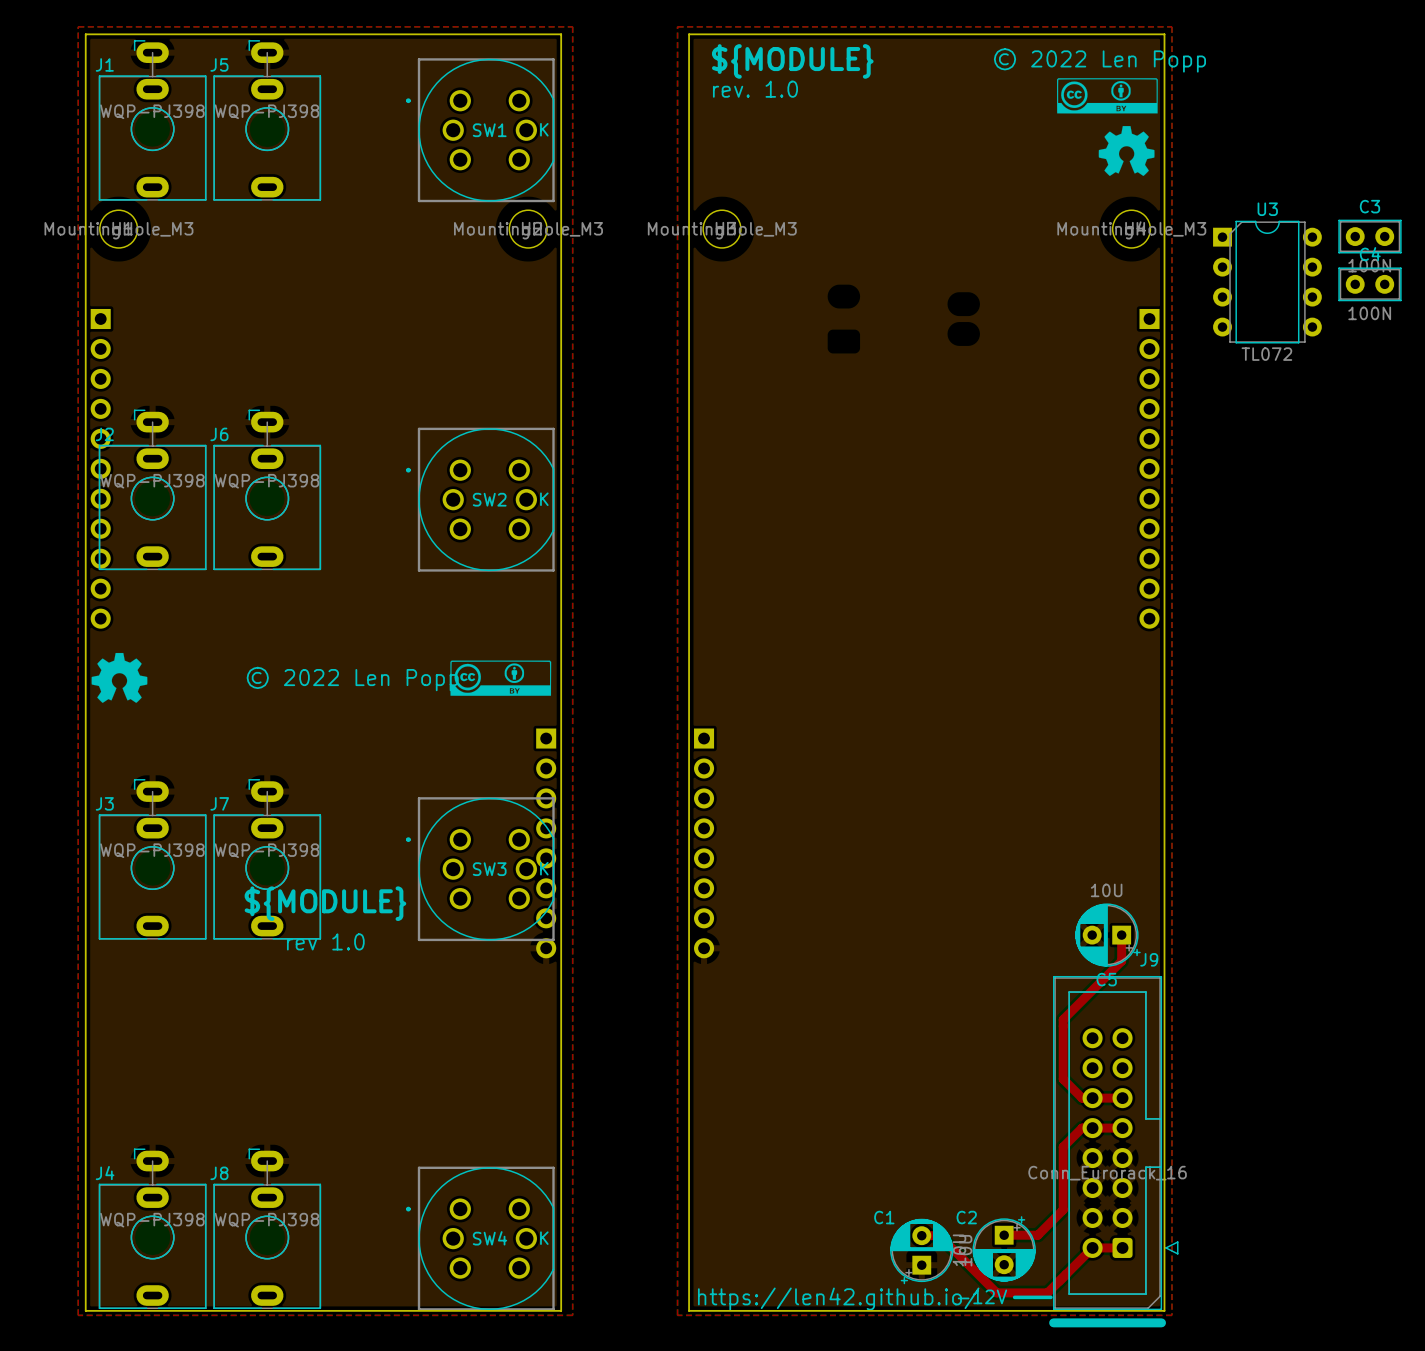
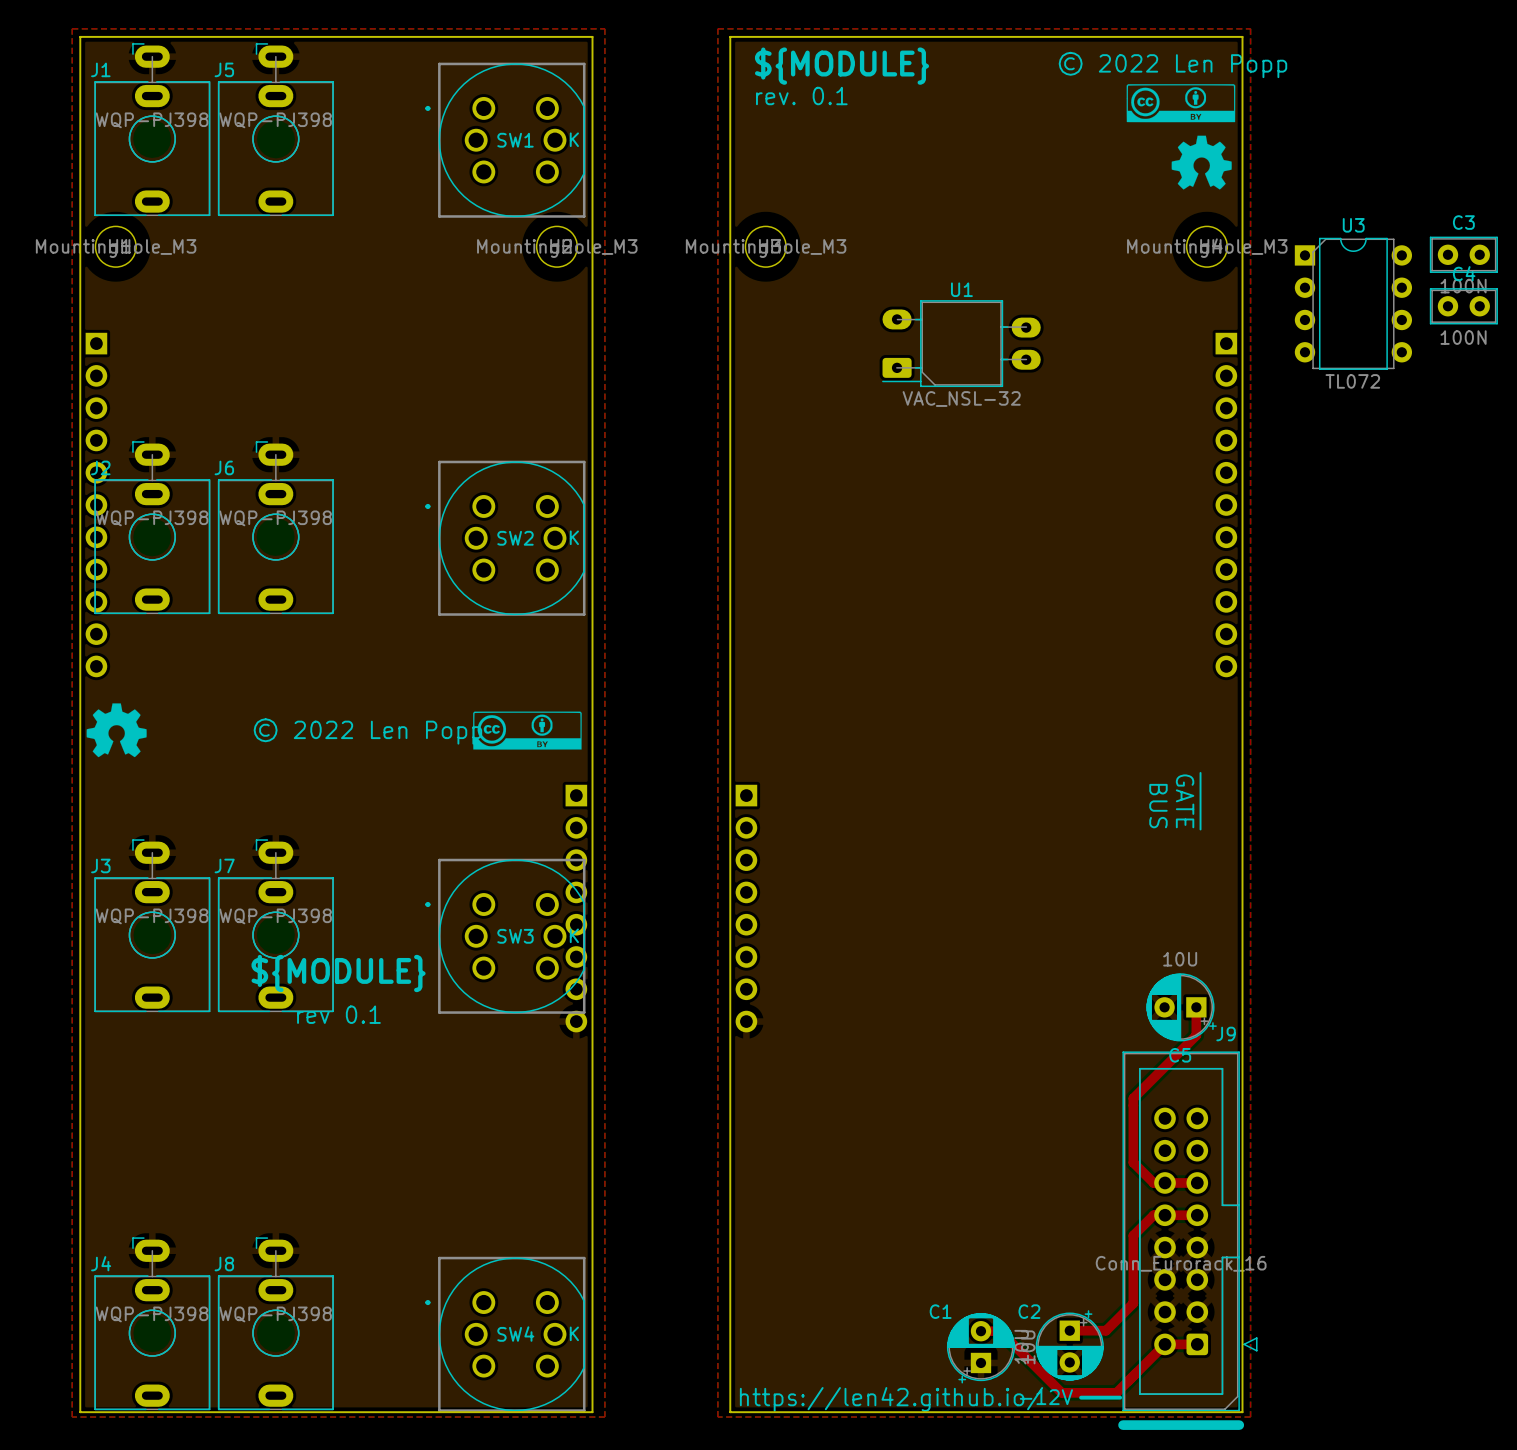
text: rev. 1.0 (755, 89) -> rev. 0.1 (801, 96)
U1: none -> VAC_NSL-32 (961, 343)
line: none -> (1200, 772) (1200, 829)
text: none -> GATE (1185, 801)
text: none -> BUS (1158, 806)
text: rev 1.0 (325, 941) -> rev 0.1 (338, 1014)

